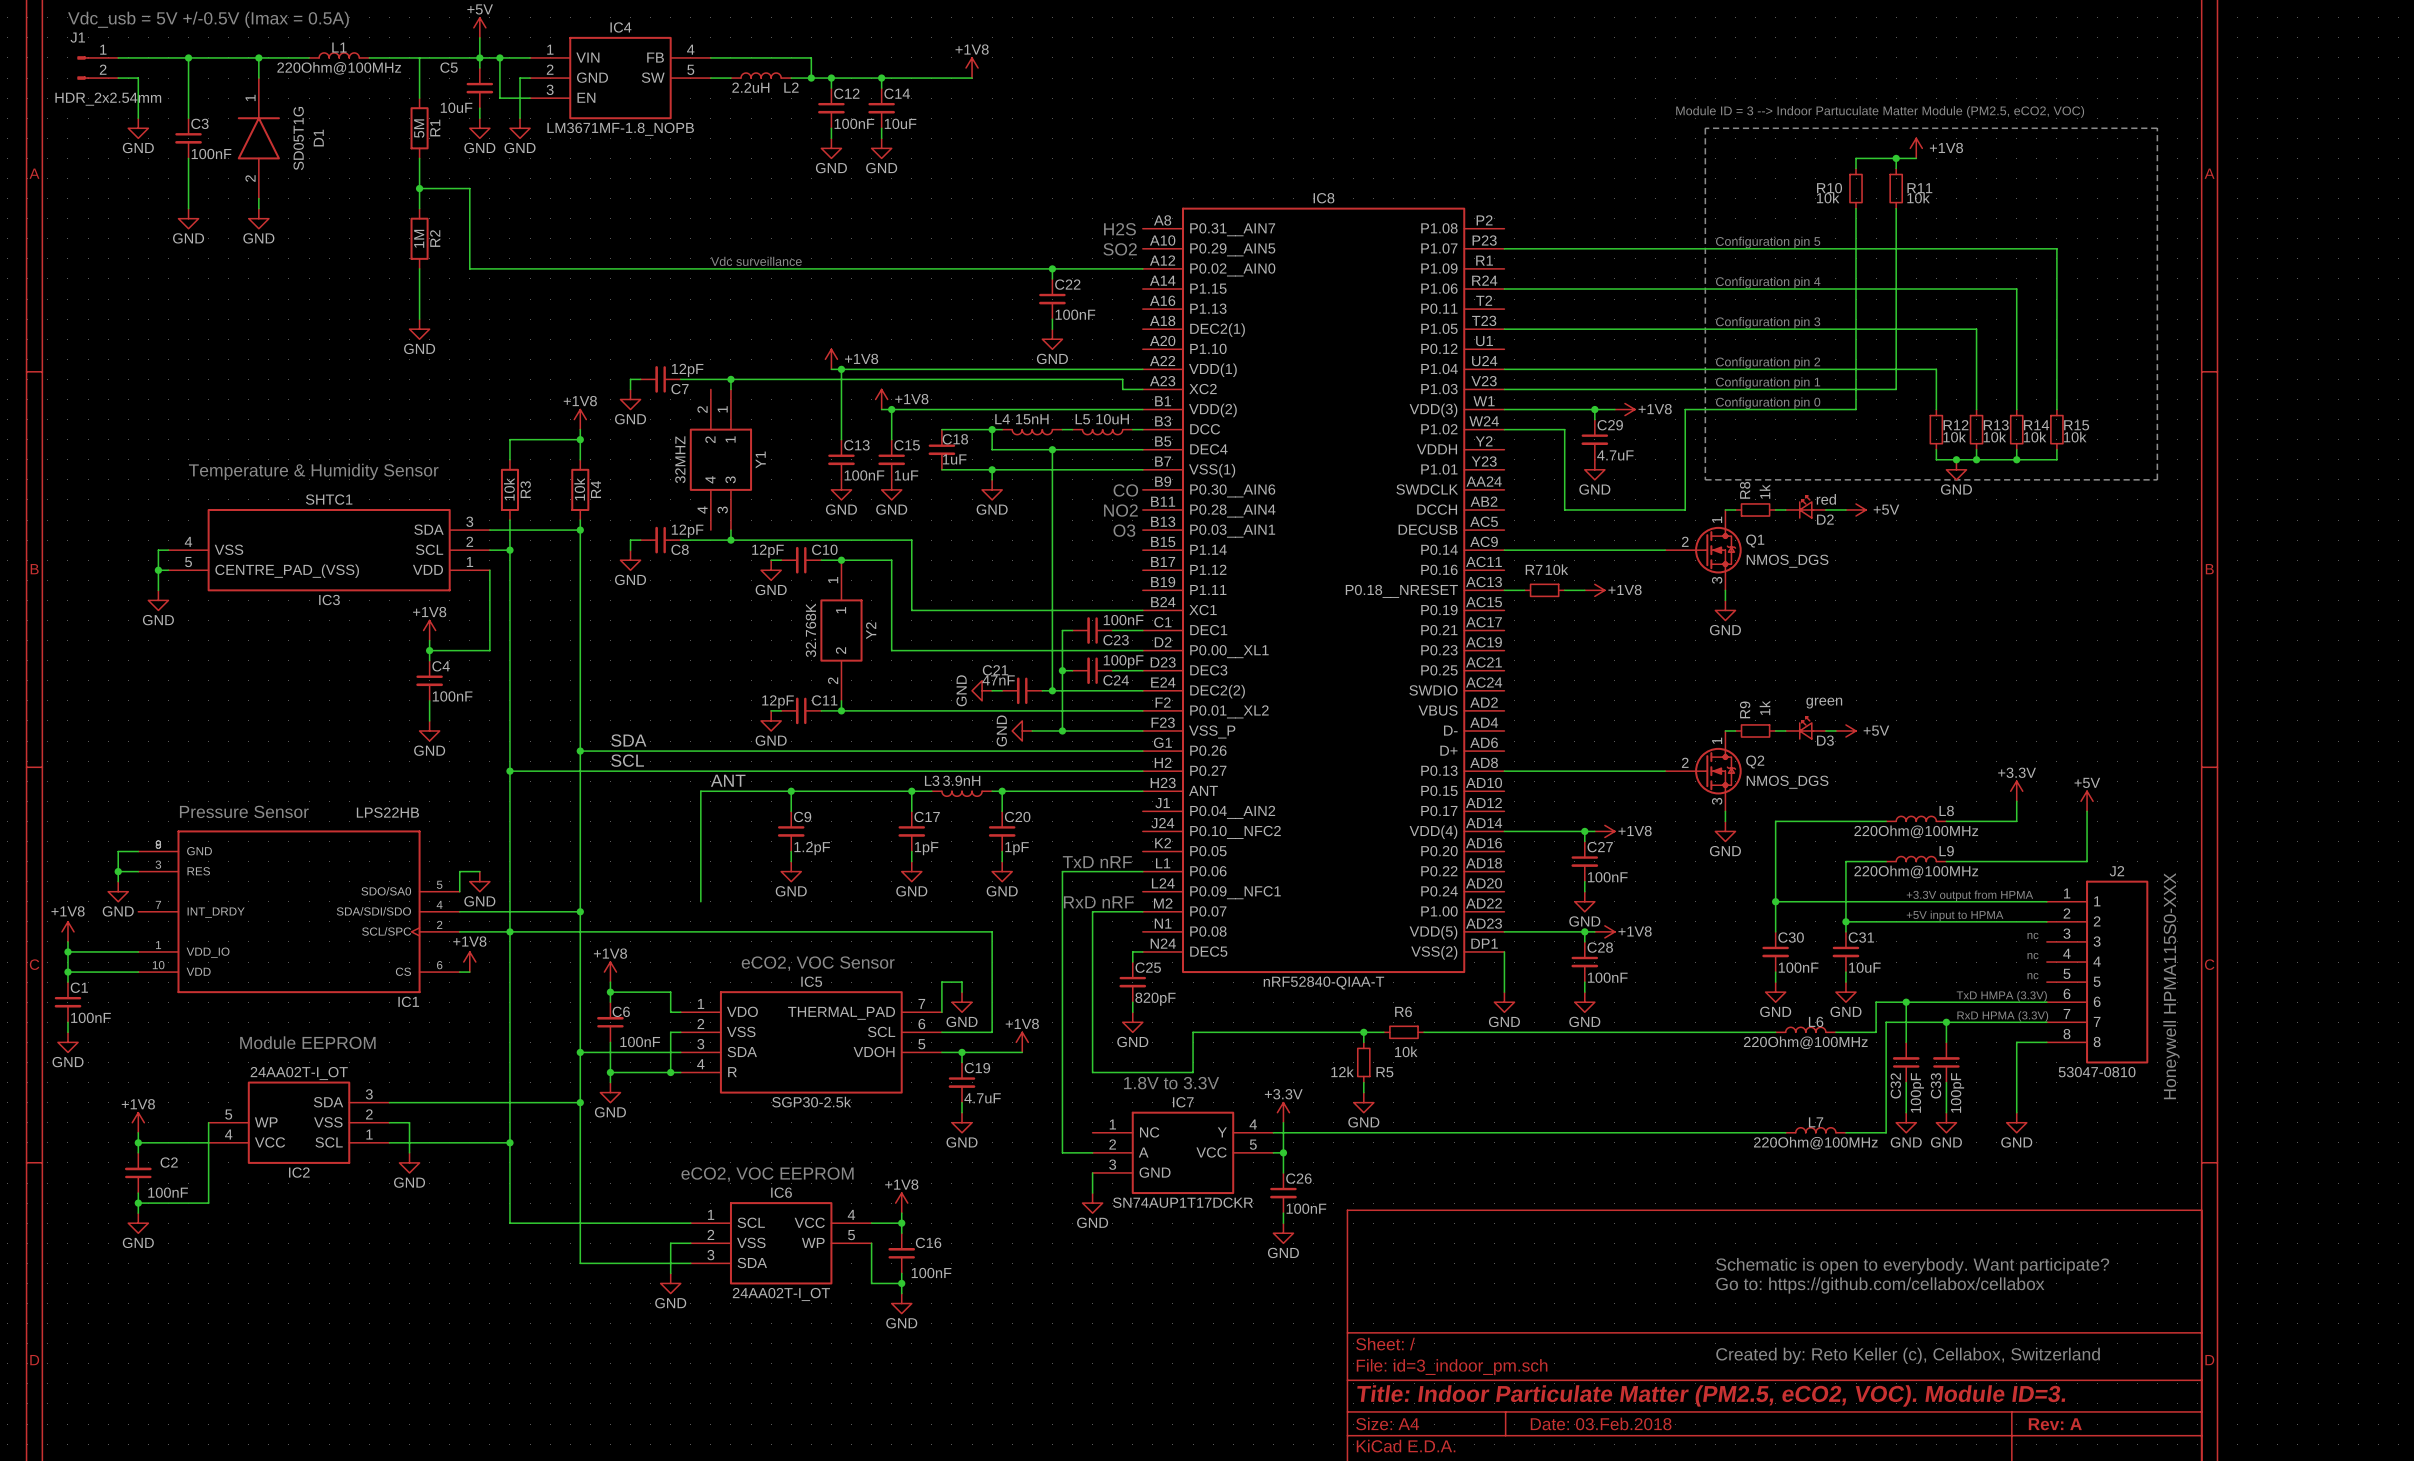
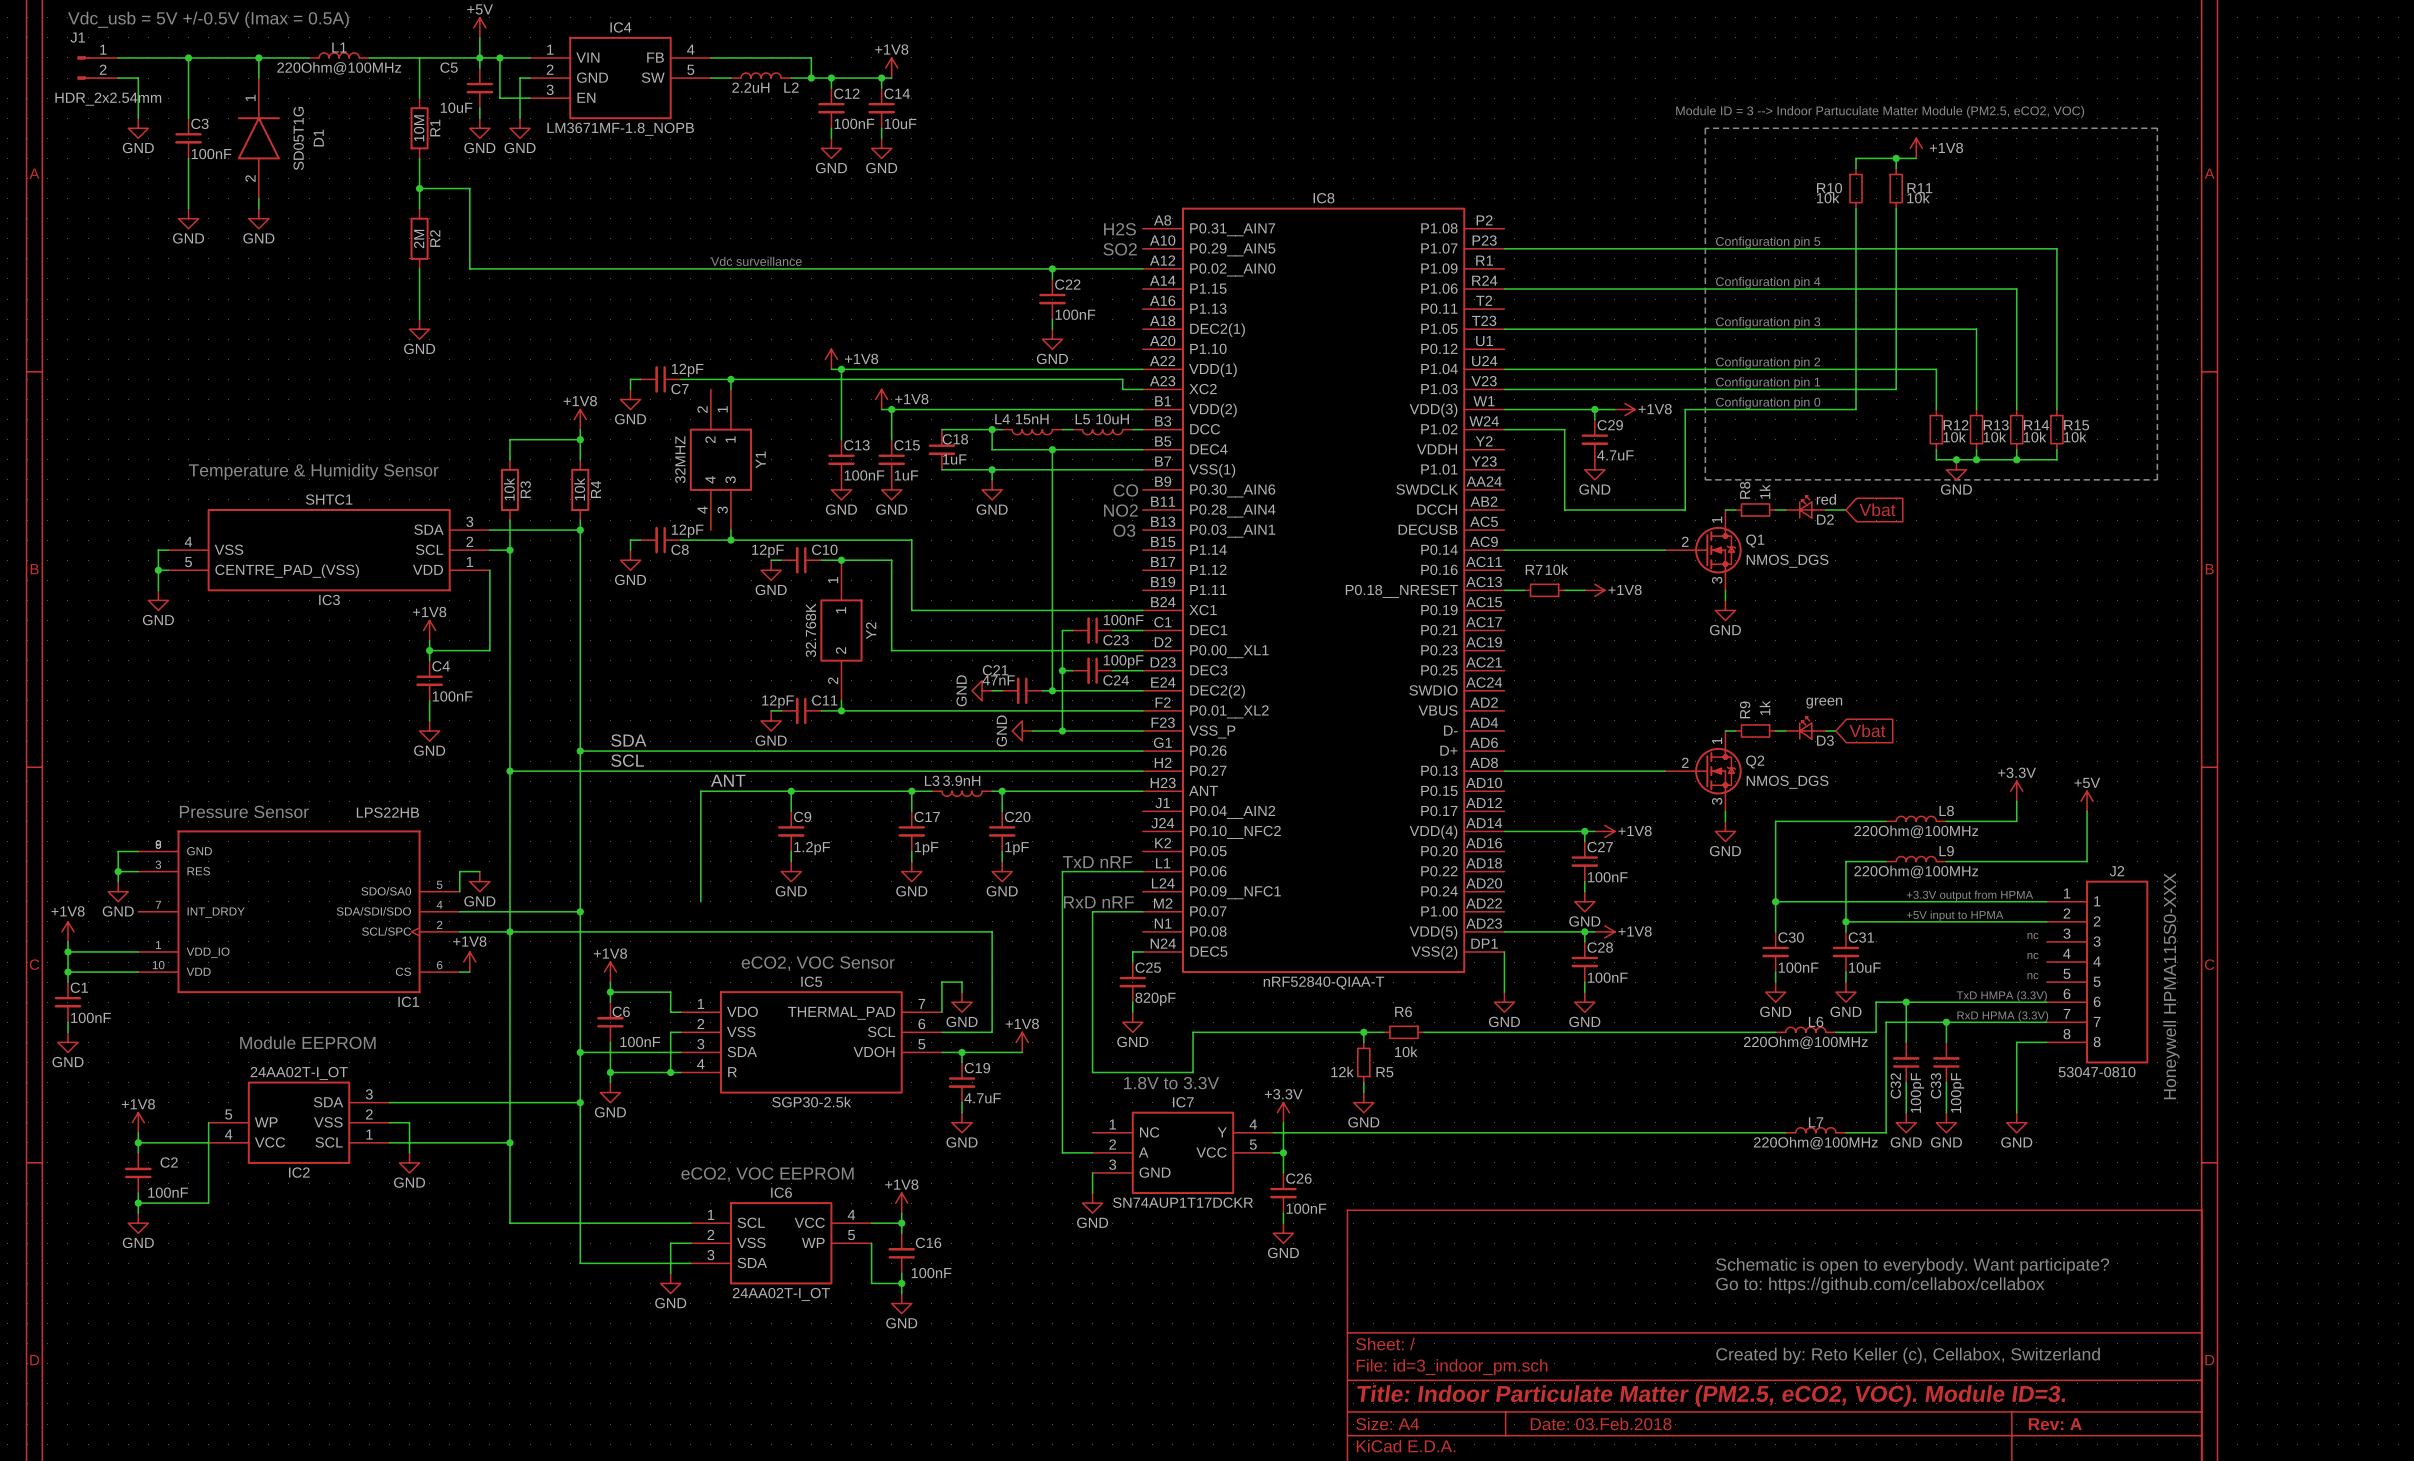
power symbol position: +1V8 (972, 68) -> +1V8 (891, 68)
wire: (891, 78) (972, 78) -> none
R1 value: 5M (419, 128) -> 10M (419, 128)
R2 value: 1M (419, 238) -> 2M (419, 239)
power symbol: +5V (1856, 509) -> none
global label: none -> Vbat (1877, 509)
power symbol: +5V (1845, 730) -> none
global label: none -> Vbat (1867, 730)

